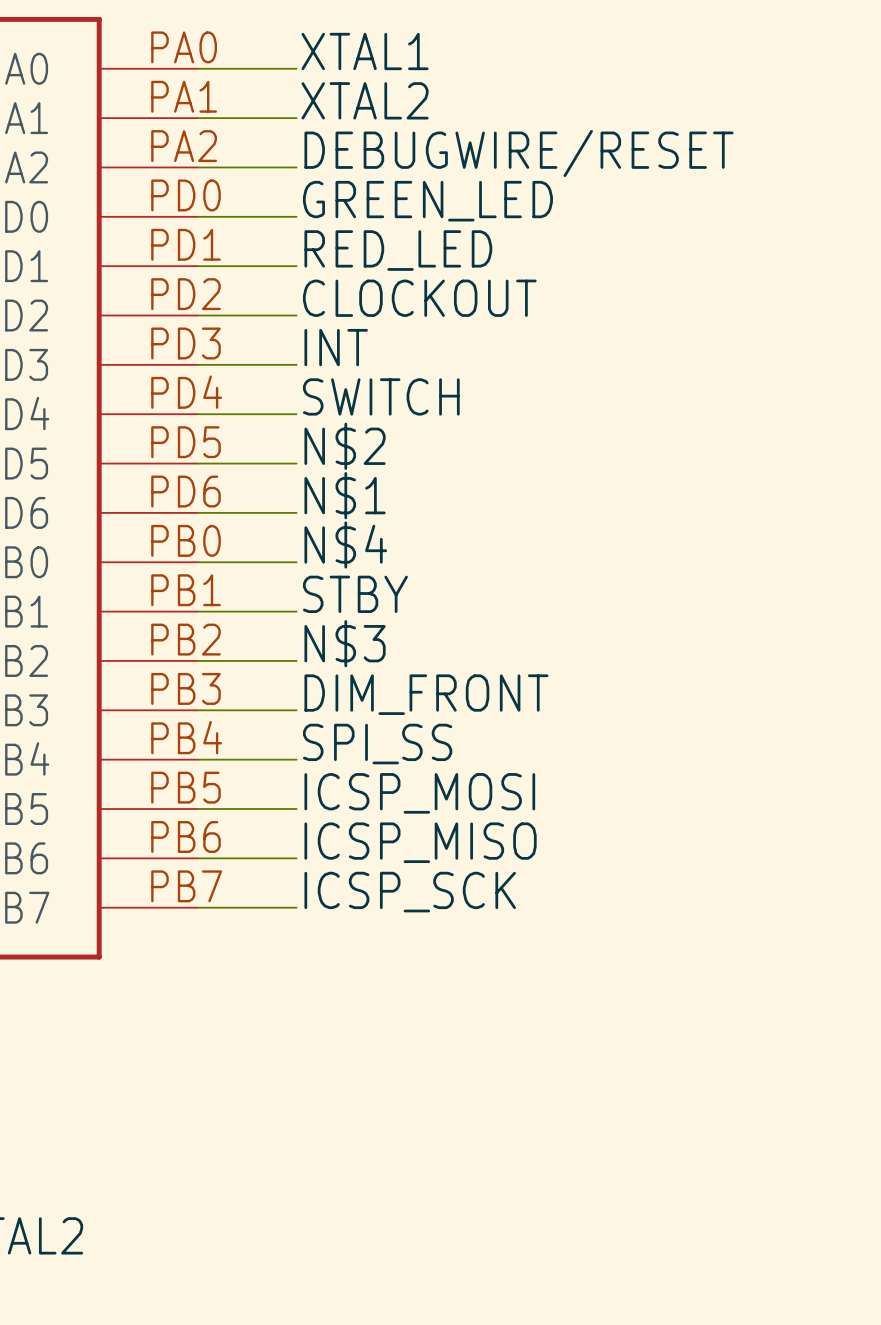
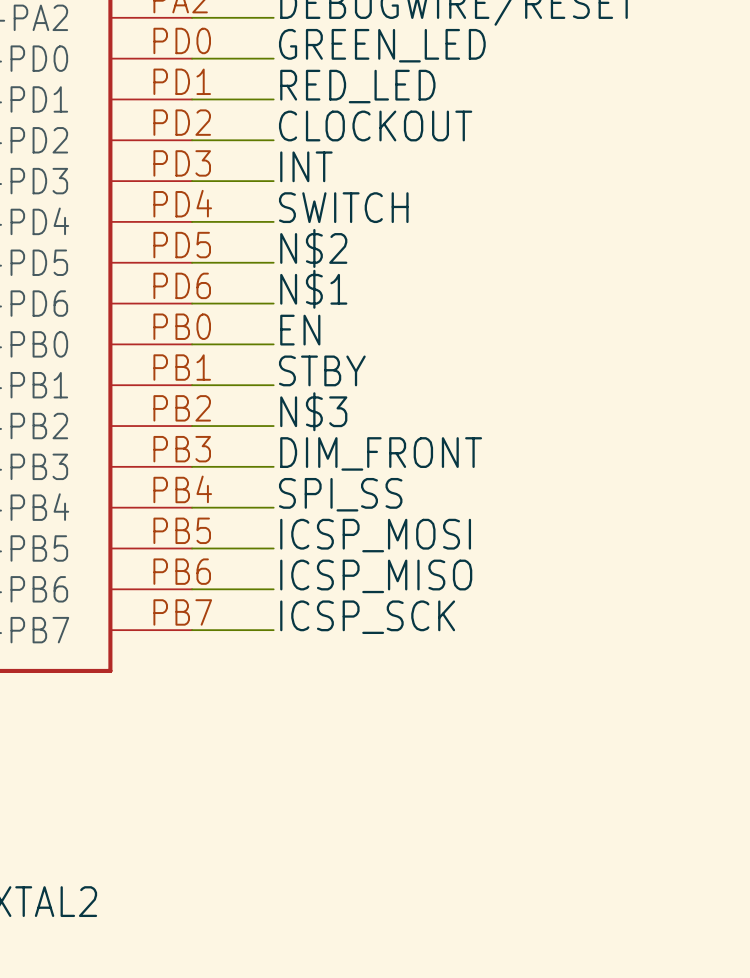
label: N$4 (345, 544) -> EN (300, 330)

